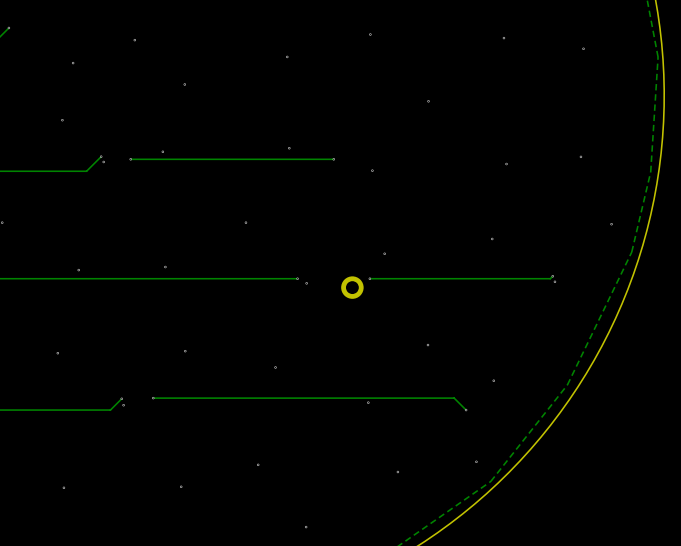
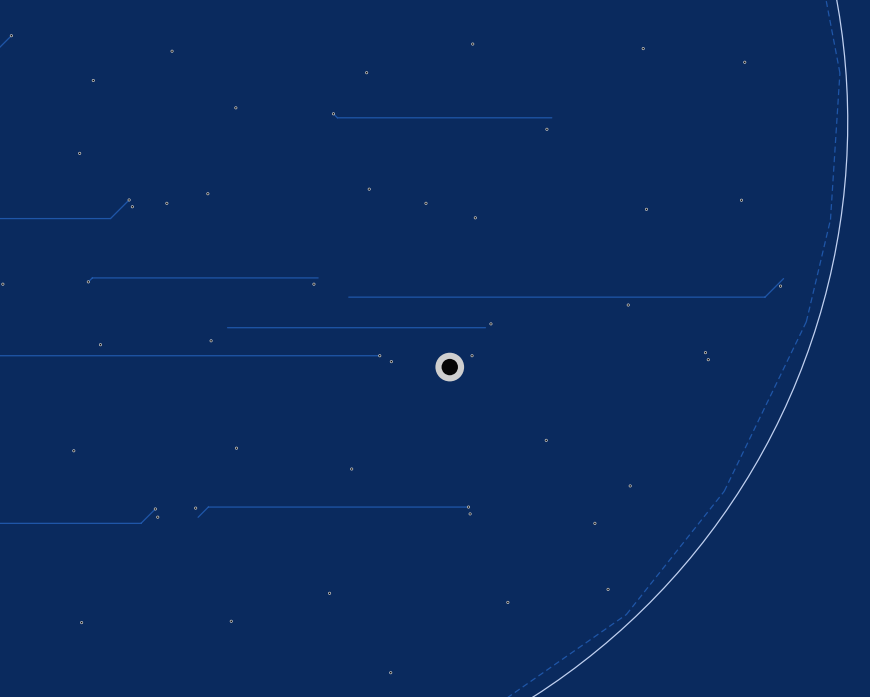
track: none -> (333, 113) (337, 117) (551, 117)
via: none -> (333, 113)
track: (333, 159) (130, 159) -> none
track: none -> (318, 277) (92, 277) (88, 281)
track: none -> (783, 278) (765, 297) (348, 297)
via: none -> (88, 281)
track: none -> (485, 327) (227, 327)
track: (552, 276) (550, 278) (369, 278) -> none
track: none -> (468, 507) (208, 507) (198, 517)
via: none -> (468, 507)
track: (153, 398) (454, 398) (466, 410) -> none

